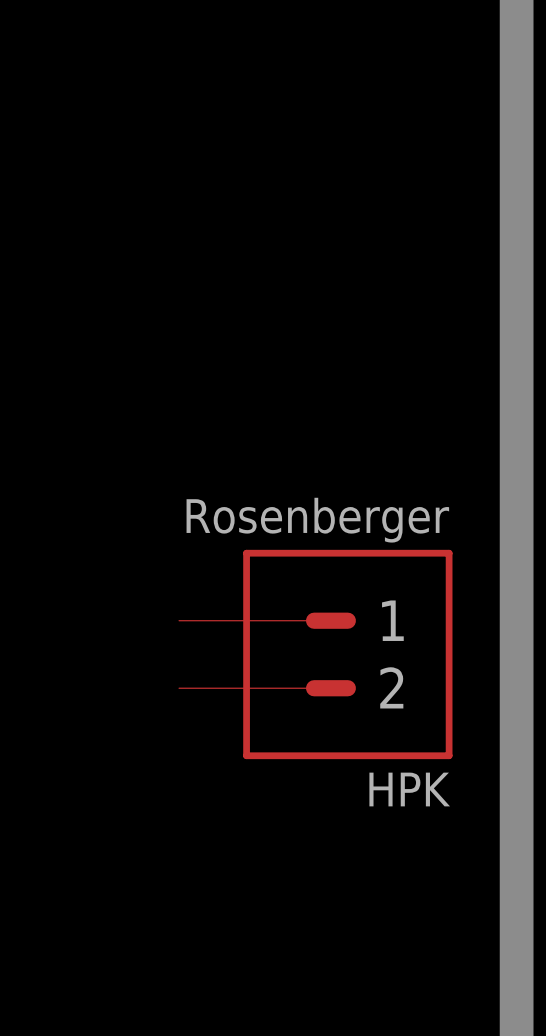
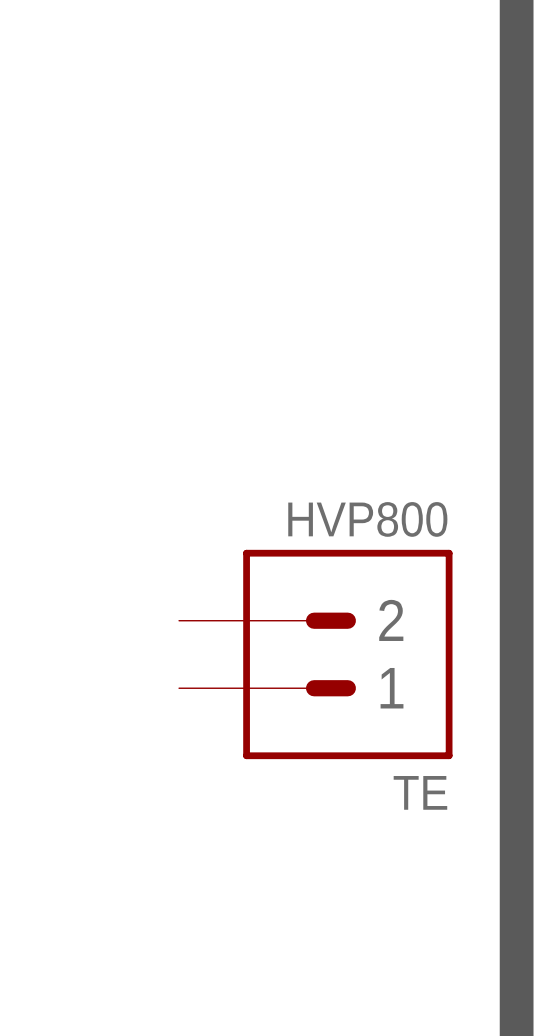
part text: Rosenberger (317, 520) -> TE (420, 792)
part flip: as is (347, 654) -> up-down (347, 654)
part text: HPK (409, 789) -> HVP800 (367, 519)

